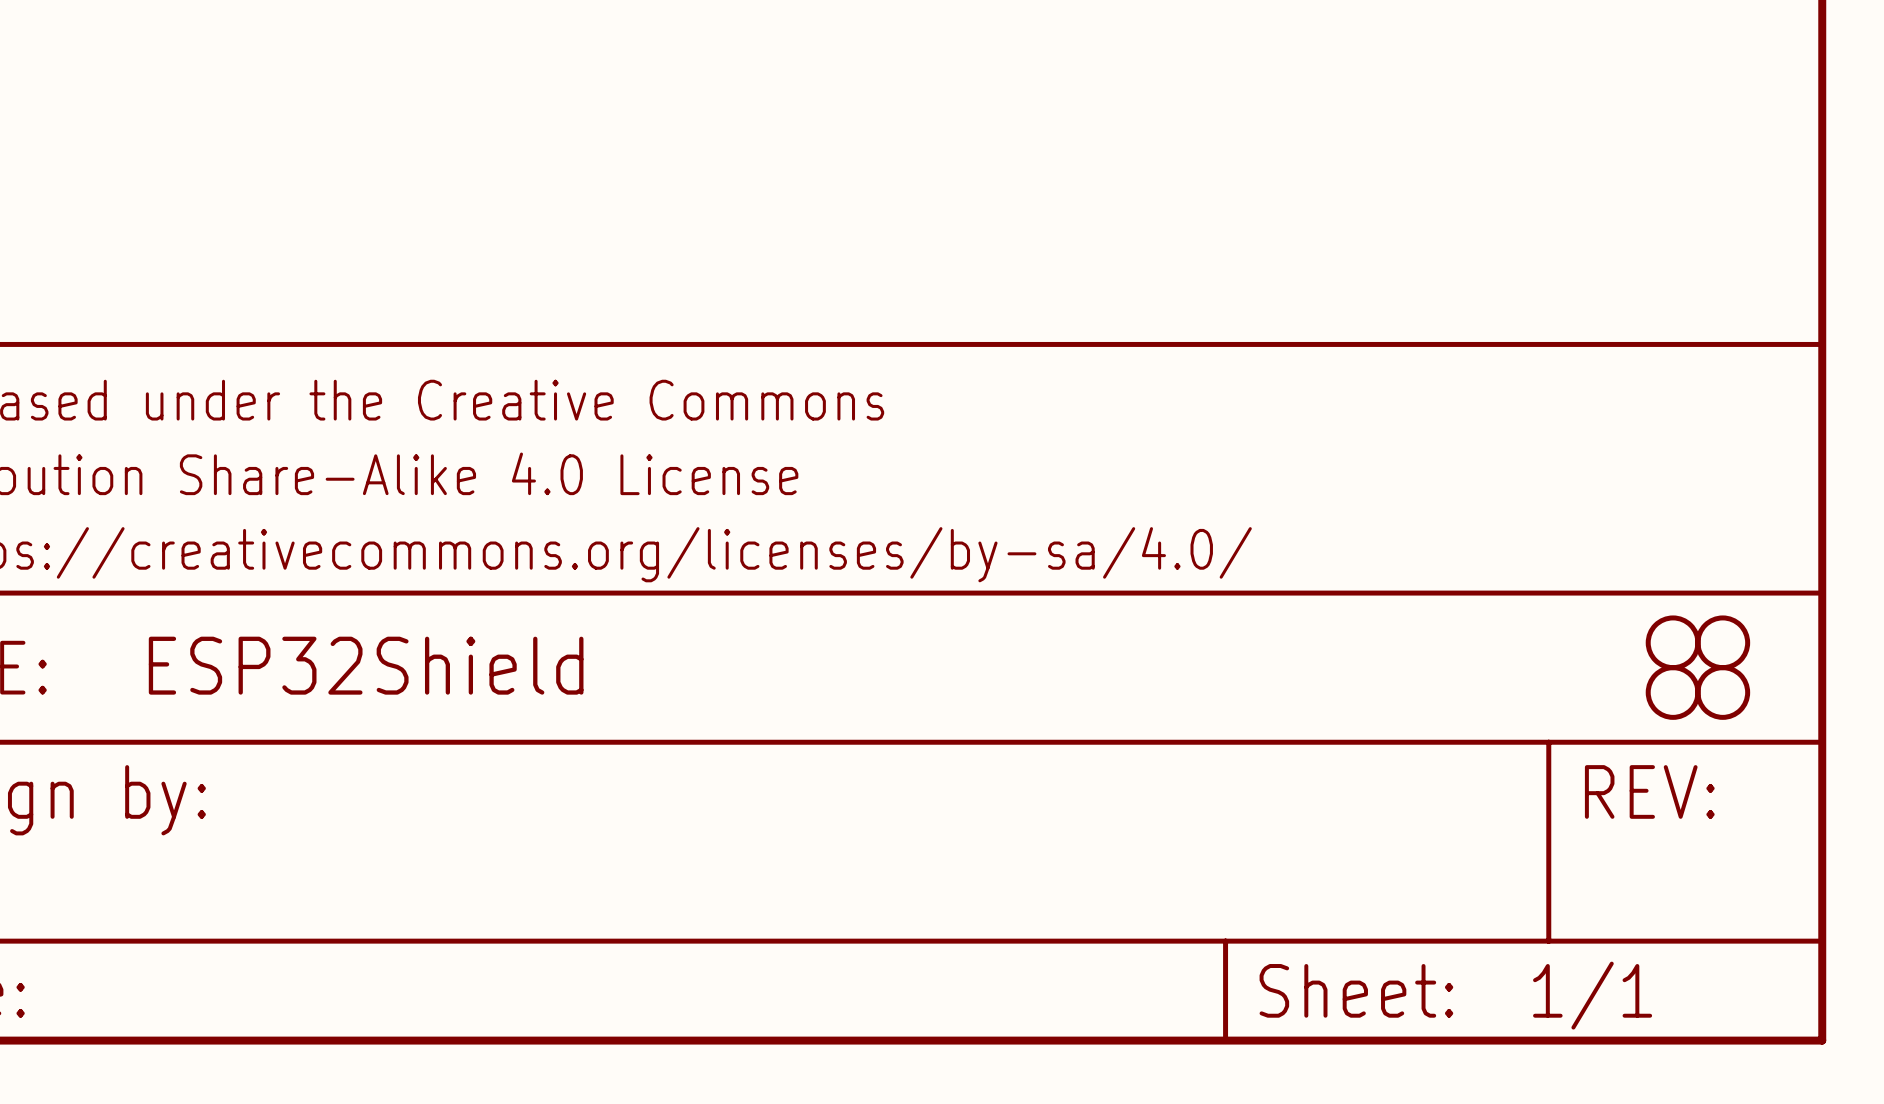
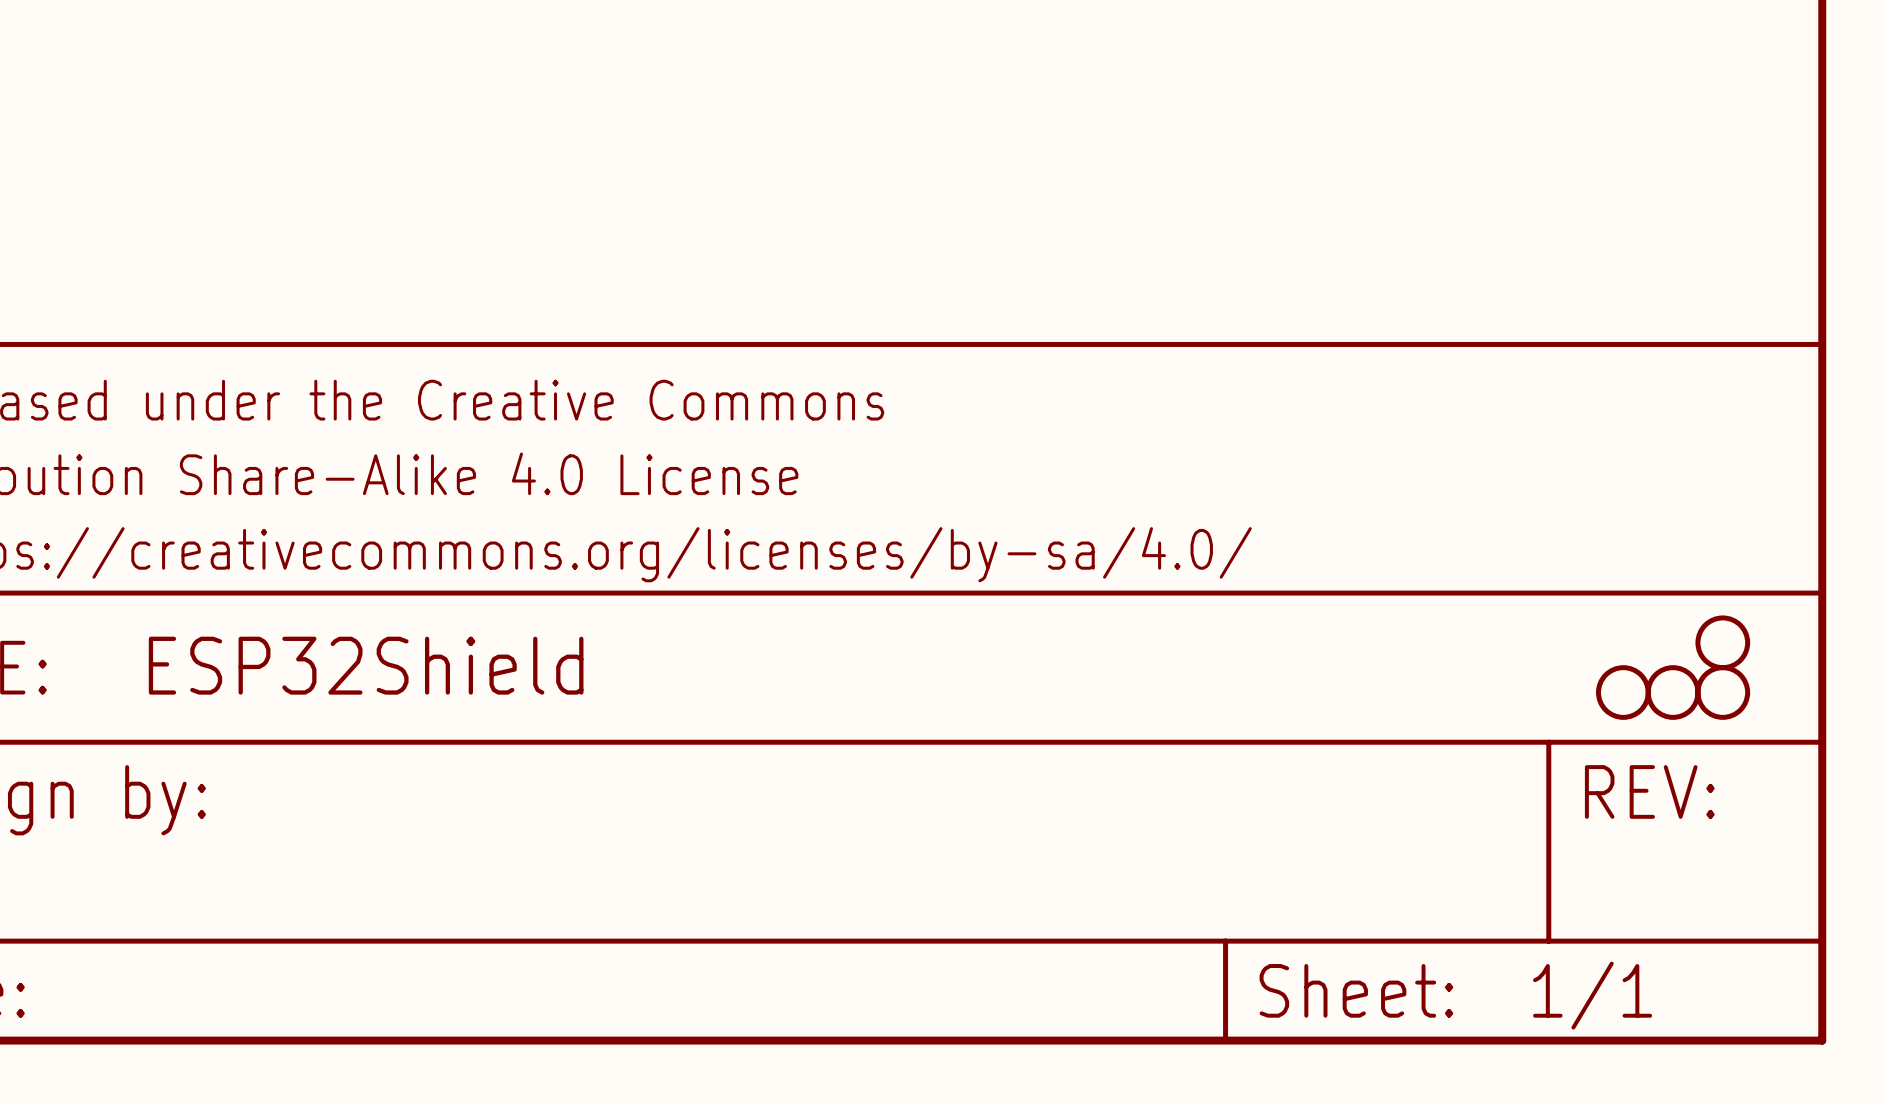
part position: (1673, 642) -> (1623, 692)

